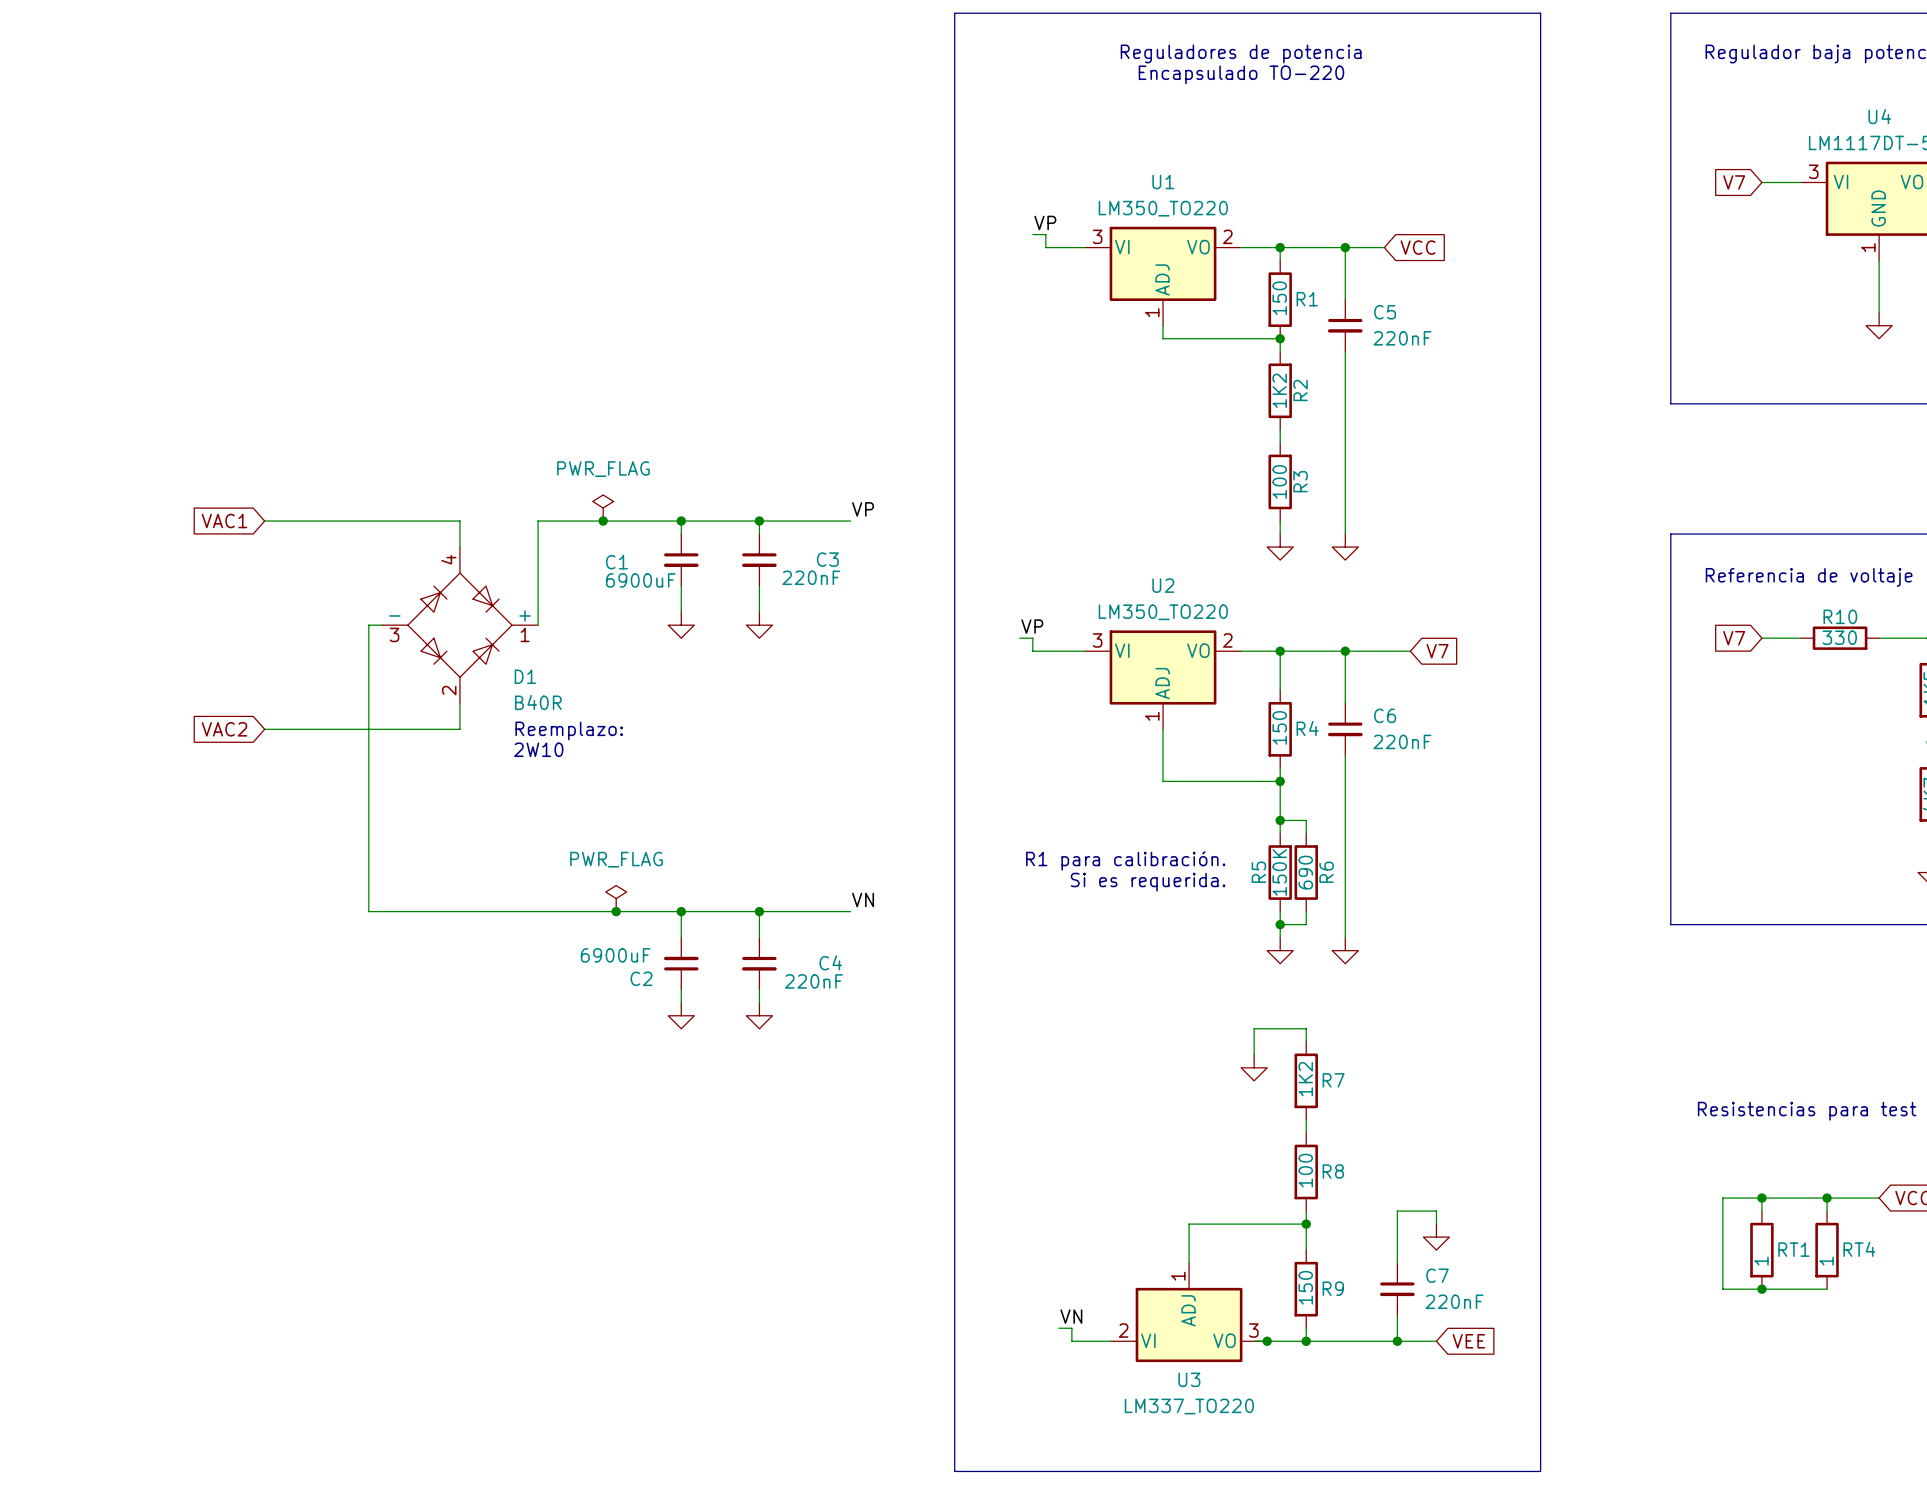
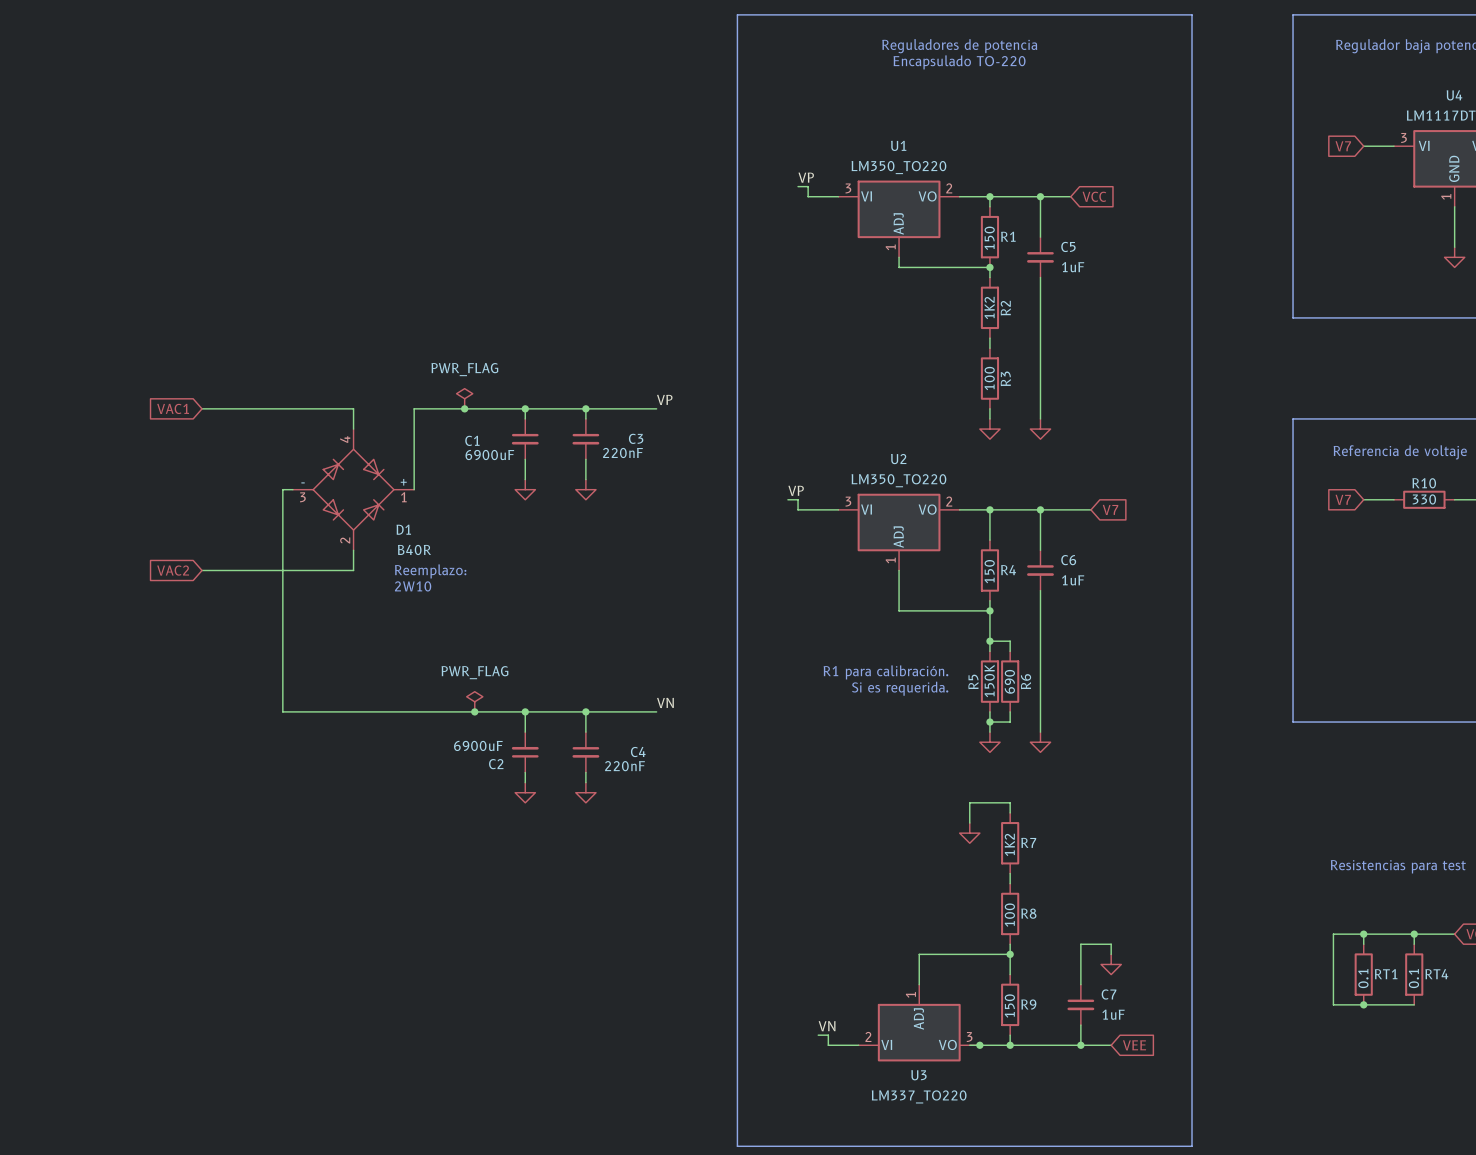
C5 value: 220nF (1402, 338) -> 1uF (1073, 267)
C6 value: 220nF (1402, 741) -> 1uF (1073, 580)
RT1 value: 1 (1761, 1261) -> 0.1 (1363, 978)
RT4 value: 1 (1826, 1261) -> 0.1 (1413, 978)
C7 value: 220nF (1454, 1301) -> 1uF (1113, 1014)

